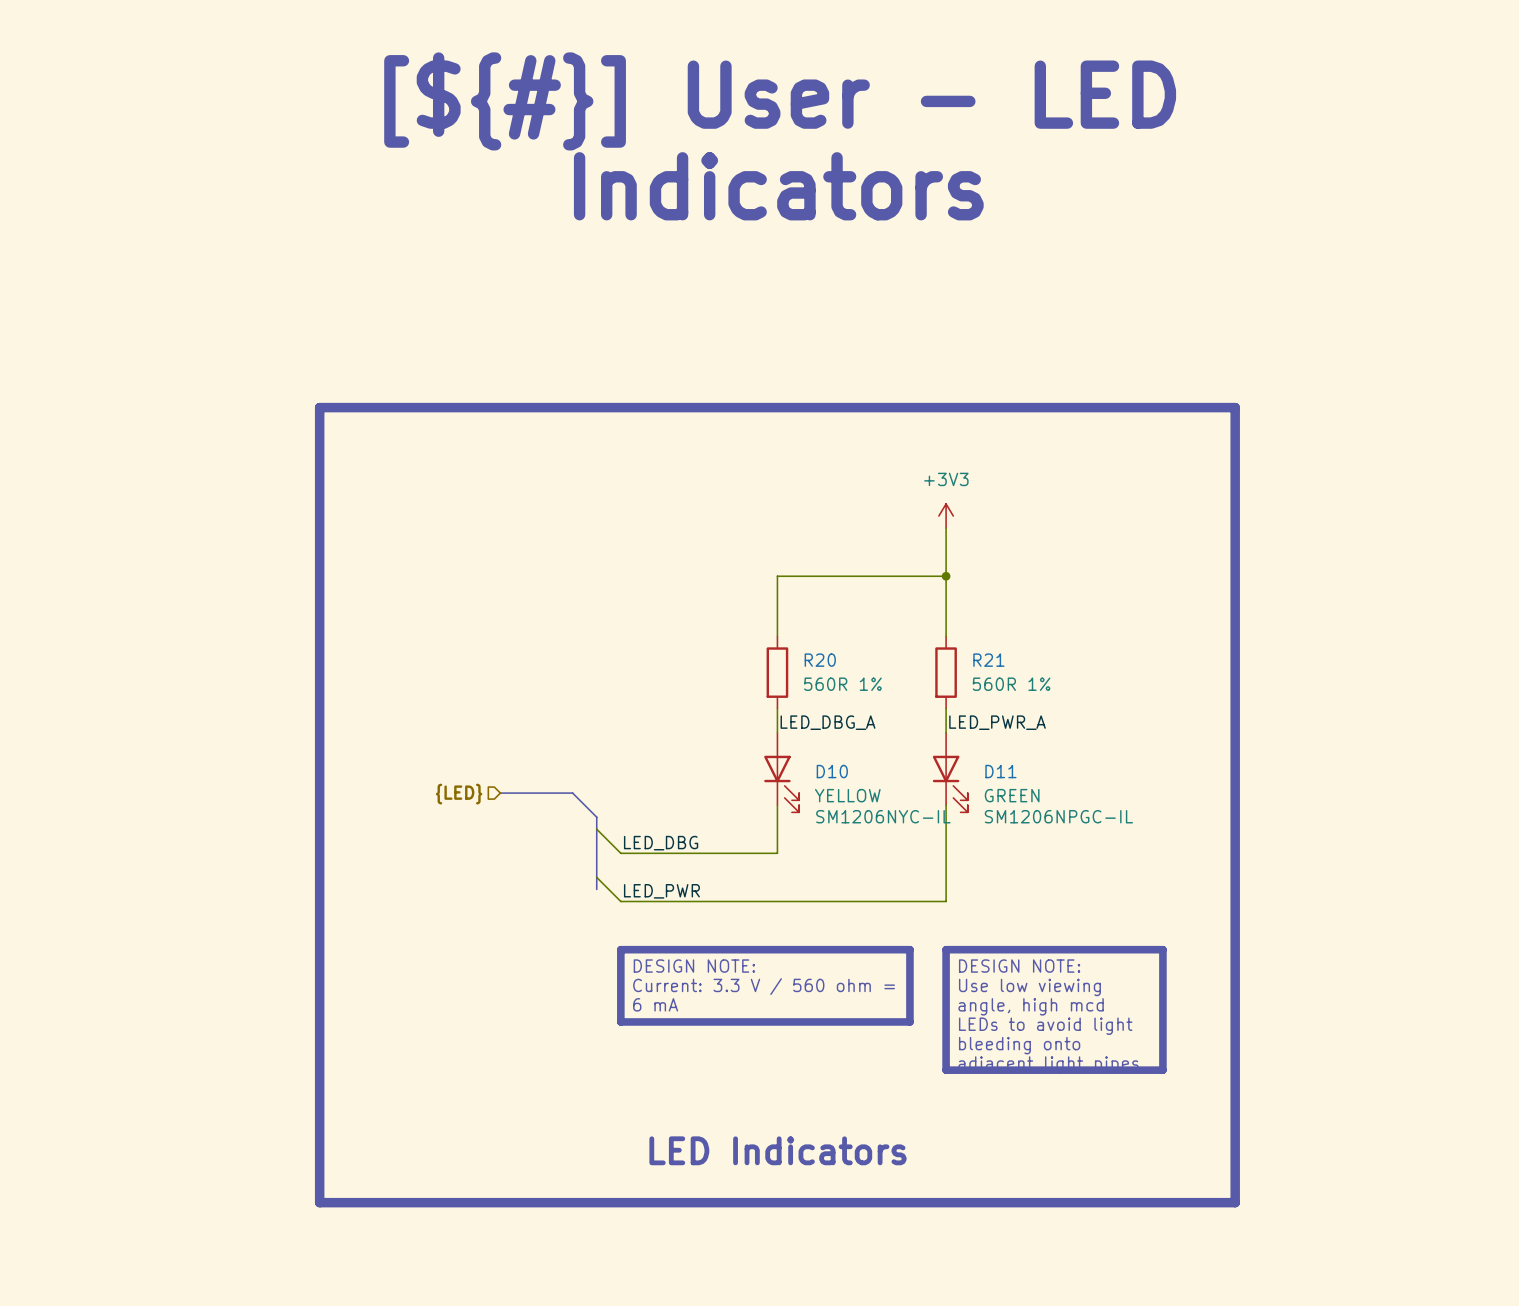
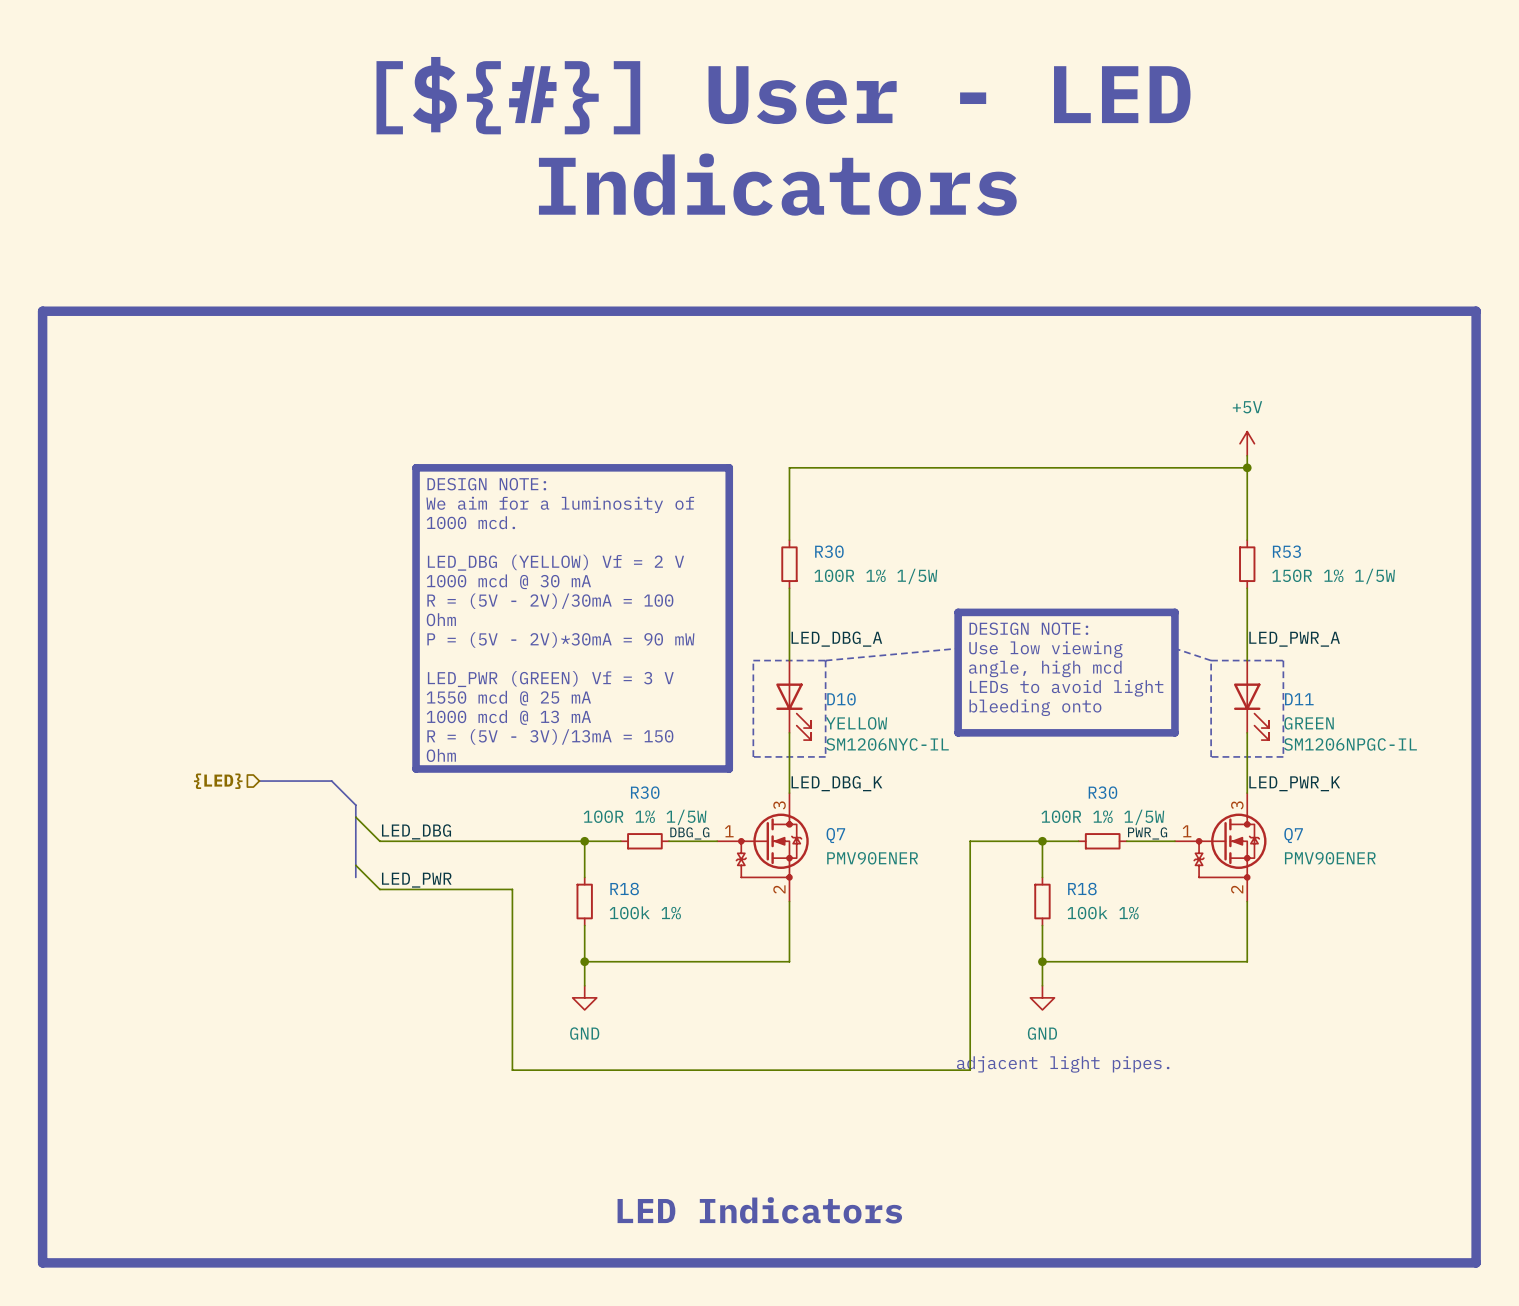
line: (319, 407) (1235, 407) (1235, 1202) (319, 1202) (319, 407) -> (42, 311) (42, 1262) (1476, 1262) (1476, 311) (42, 311)
power symbol: none -> +5V (1247, 443)
wire: none -> (1247, 455) (1247, 540)
line: none -> (416, 467) (729, 467) (729, 768) (416, 768) (416, 467)
wire: none -> (1247, 467) (789, 467) (789, 540)
junction: none -> (1247, 467)
text: none -> DESIGN NOTE: (486, 484)
text: none -> We aim for a luminosity of (560, 504)
power symbol: +3V3 (946, 516) -> none
text: none -> 1000 mcd. (470, 522)
wire: (946, 528) (946, 636) -> none
text: none -> LED_DBG (YELLOW) Vf = 2 V (555, 562)
R30: none -> 100R 1% 1/5W (789, 564)
R53: none -> 150R 1% 1/5W (1247, 564)
wire: (946, 576) (777, 576) (777, 636) -> none
junction: (946, 576) -> none
text: none -> 1000 mcd @ 30 mA (508, 581)
wire: none -> (789, 588) (789, 660)
wire: none -> (1247, 588) (1247, 660)
text: none -> R = (5V - 2V)/30mA = 100 (550, 601)
line: none -> (958, 612) (1174, 612) (1174, 732) (958, 732) (958, 612)
text: none -> Ohm (441, 619)
text: none -> DESIGN NOTE: (1028, 628)
label: none -> LED_PWR_A (1294, 639)
text: none -> P = (5V - 2V)*30mA = 90 mW (560, 640)
line: none -> (958, 648) (825, 660)
line: none -> (1174, 648) (1211, 660)
text: none -> Use low viewing (1045, 649)
line: none -> (825, 660) (753, 660) (753, 756) (825, 756) (825, 660)
line: none -> (1211, 660) (1283, 660) (1283, 756) (1211, 756) (1211, 660)
text: none -> angle, high mcd (1045, 668)
R20: 560R 1% (777, 672) -> none
R21: 560R 1% (946, 672) -> none
text: none -> LED_PWR (GREEN) Vf = 3 V (550, 679)
text: none -> LEDs to avoid light (1066, 688)
text: none -> 1550 mcd @ 25 mA (508, 698)
wire: (777, 708) (777, 732) -> none
wire: (946, 708) (946, 732) -> none
text: none -> bleeding onto (1035, 707)
text: none -> 1000 mcd @ 13 mA (508, 717)
label position: LED_DBG_A (828, 722) -> LED_DBG_A (836, 639)
label: LED_PWR_A (997, 722) -> none
wire: none -> (789, 732) (789, 793)
wire: none -> (1247, 732) (1247, 793)
text: none -> R = (5V - 3V)/13mA = 150 (550, 736)
text: none -> Ohm (441, 755)
D10 position: (781, 772) -> (793, 700)
D11 position: (950, 772) -> (1251, 700)
bus: none -> (259, 781) (331, 781) (355, 805) (355, 877)
hierarchical label: none -> {LED} (218, 781)
label: none -> LED_DBG_K (836, 783)
label: none -> LED_PWR_K (1294, 783)
bus: (500, 793) (572, 793) (596, 817) (596, 889) -> none
hierarchical label: {LED} (459, 794) -> none
wire: (777, 805) (777, 853) (620, 853) (596, 829) -> none
wire: (946, 805) (946, 901) (620, 901) (596, 877) -> none
wire: none -> (355, 817) (379, 841) (620, 841)
label: none -> LED_DBG (416, 831)
label: none -> DBG_G (689, 833)
label: none -> PWR_G (1147, 833)
wire: none -> (584, 841) (584, 877)
junction: none -> (584, 841)
R30: none -> 100R 1% 1/5W (644, 841)
wire: none -> (669, 841) (717, 841)
wire: none -> (1042, 841) (1042, 877)
junction: none -> (1042, 841)
wire: none -> (1078, 841) (970, 841) (970, 1070) (512, 1070) (512, 889) (379, 889) (355, 865)
R30: none -> 100R 1% 1/5W (1102, 841)
wire: none -> (1126, 841) (1174, 841)
label: LED_DBG (661, 843) -> none
Q7: none -> PMV90ENER (762, 847)
Q7: none -> PMV90ENER (1220, 847)
label: none -> LED_PWR (416, 880)
label: LED_PWR (661, 891) -> none
R18: none -> 100k 1% (584, 901)
wire: none -> (789, 901) (789, 961) (584, 961)
R18: none -> 100k 1% (1042, 901)
wire: none -> (1247, 901) (1247, 961) (1042, 961)
wire: none -> (584, 925) (584, 985)
wire: none -> (1042, 925) (1042, 985)
line: (620, 949) (909, 949) (909, 1021) (620, 1021) (620, 949) -> none
line: (946, 949) (1162, 949) (1162, 1070) (946, 1070) (946, 949) -> none
junction: none -> (584, 961)
junction: none -> (1042, 961)
text: DESIGN NOTE: (694, 966) -> none
text: DESIGN NOTE: (1019, 966) -> none
text: Current: 3.3 V / 560 ohm = (764, 986) -> none
text: Use low viewing (1029, 987) -> none
power symbol: none -> GND (584, 997)
power symbol: none -> GND (1042, 997)
text: 6 mA (655, 1004) -> none
text: angle, high mcd (1031, 1006) -> none
text: LEDs to avoid light (1045, 1026) -> none
text: bleeding onto (1019, 1045) -> none
text position: LED Indicators (778, 1150) -> LED Indicators (759, 1210)

